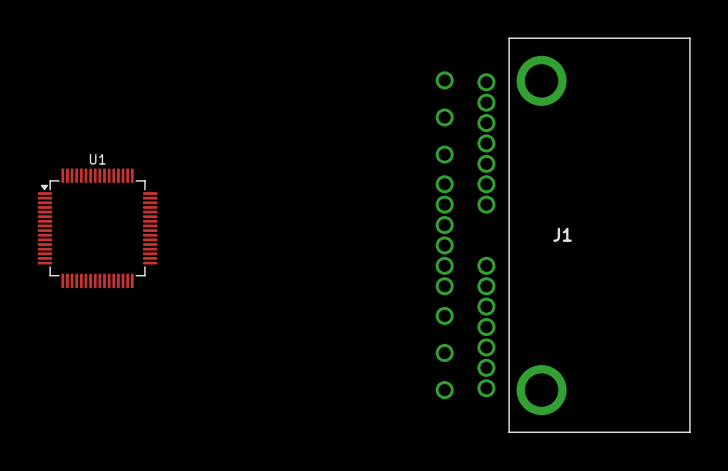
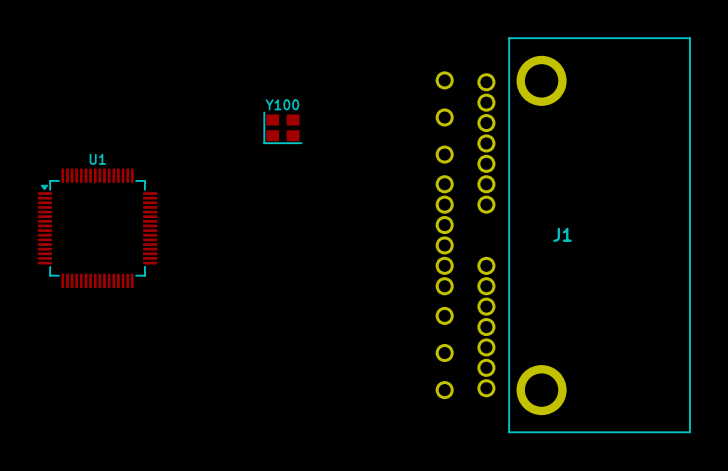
Y100: none -> (282, 127)

